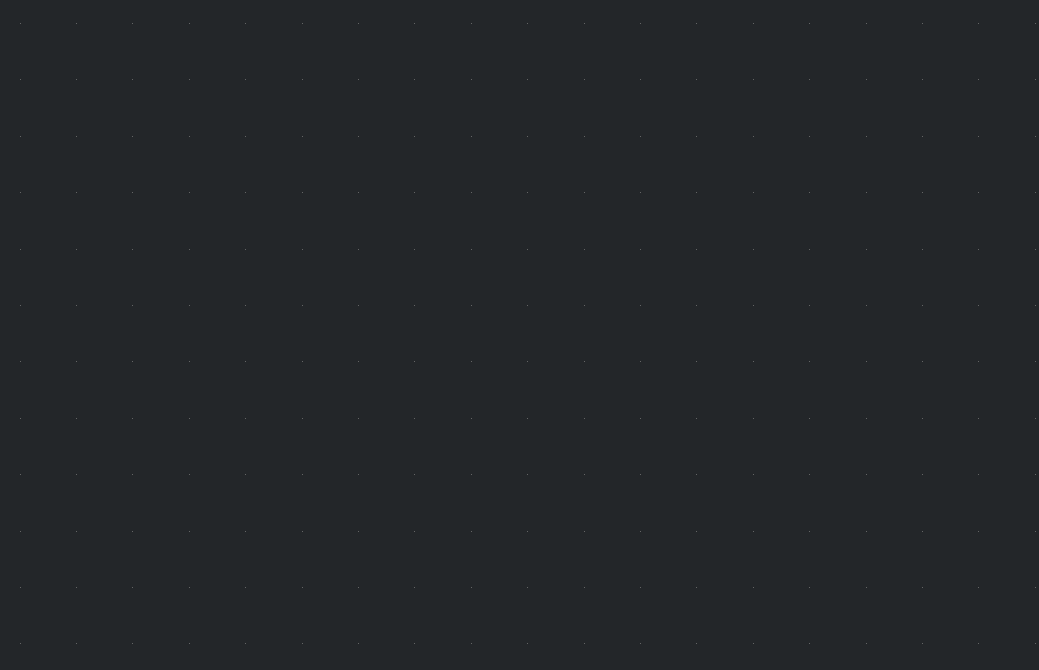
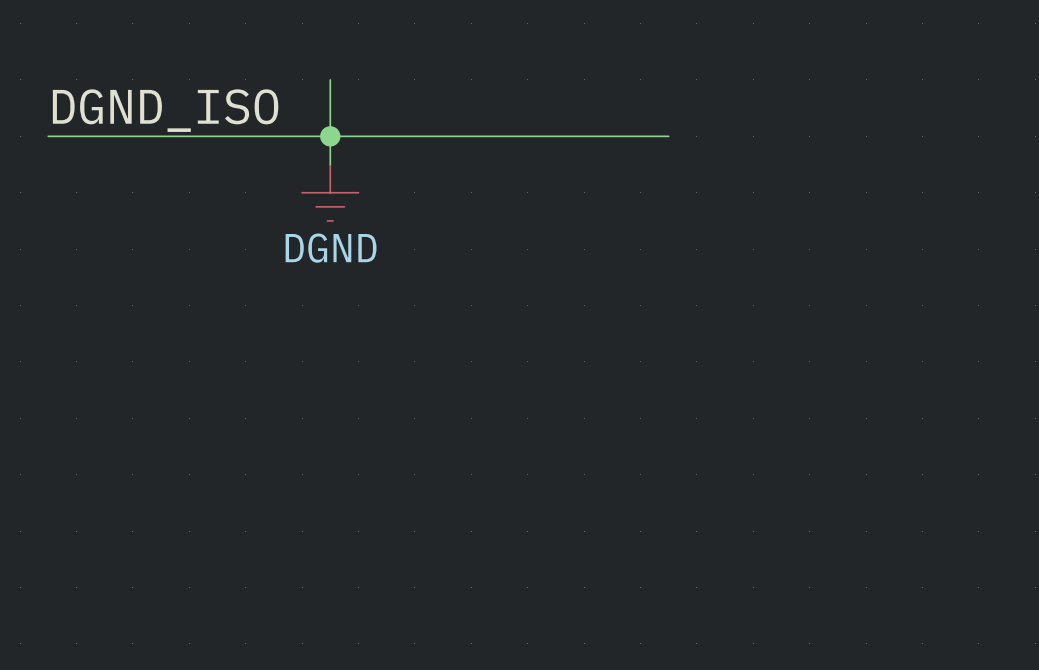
wire: none -> (330, 79) (330, 164)
label: none -> DGND_ISO (165, 110)
wire: none -> (48, 136) (668, 136)
junction: none -> (330, 136)
power symbol: none -> DGND (330, 192)

